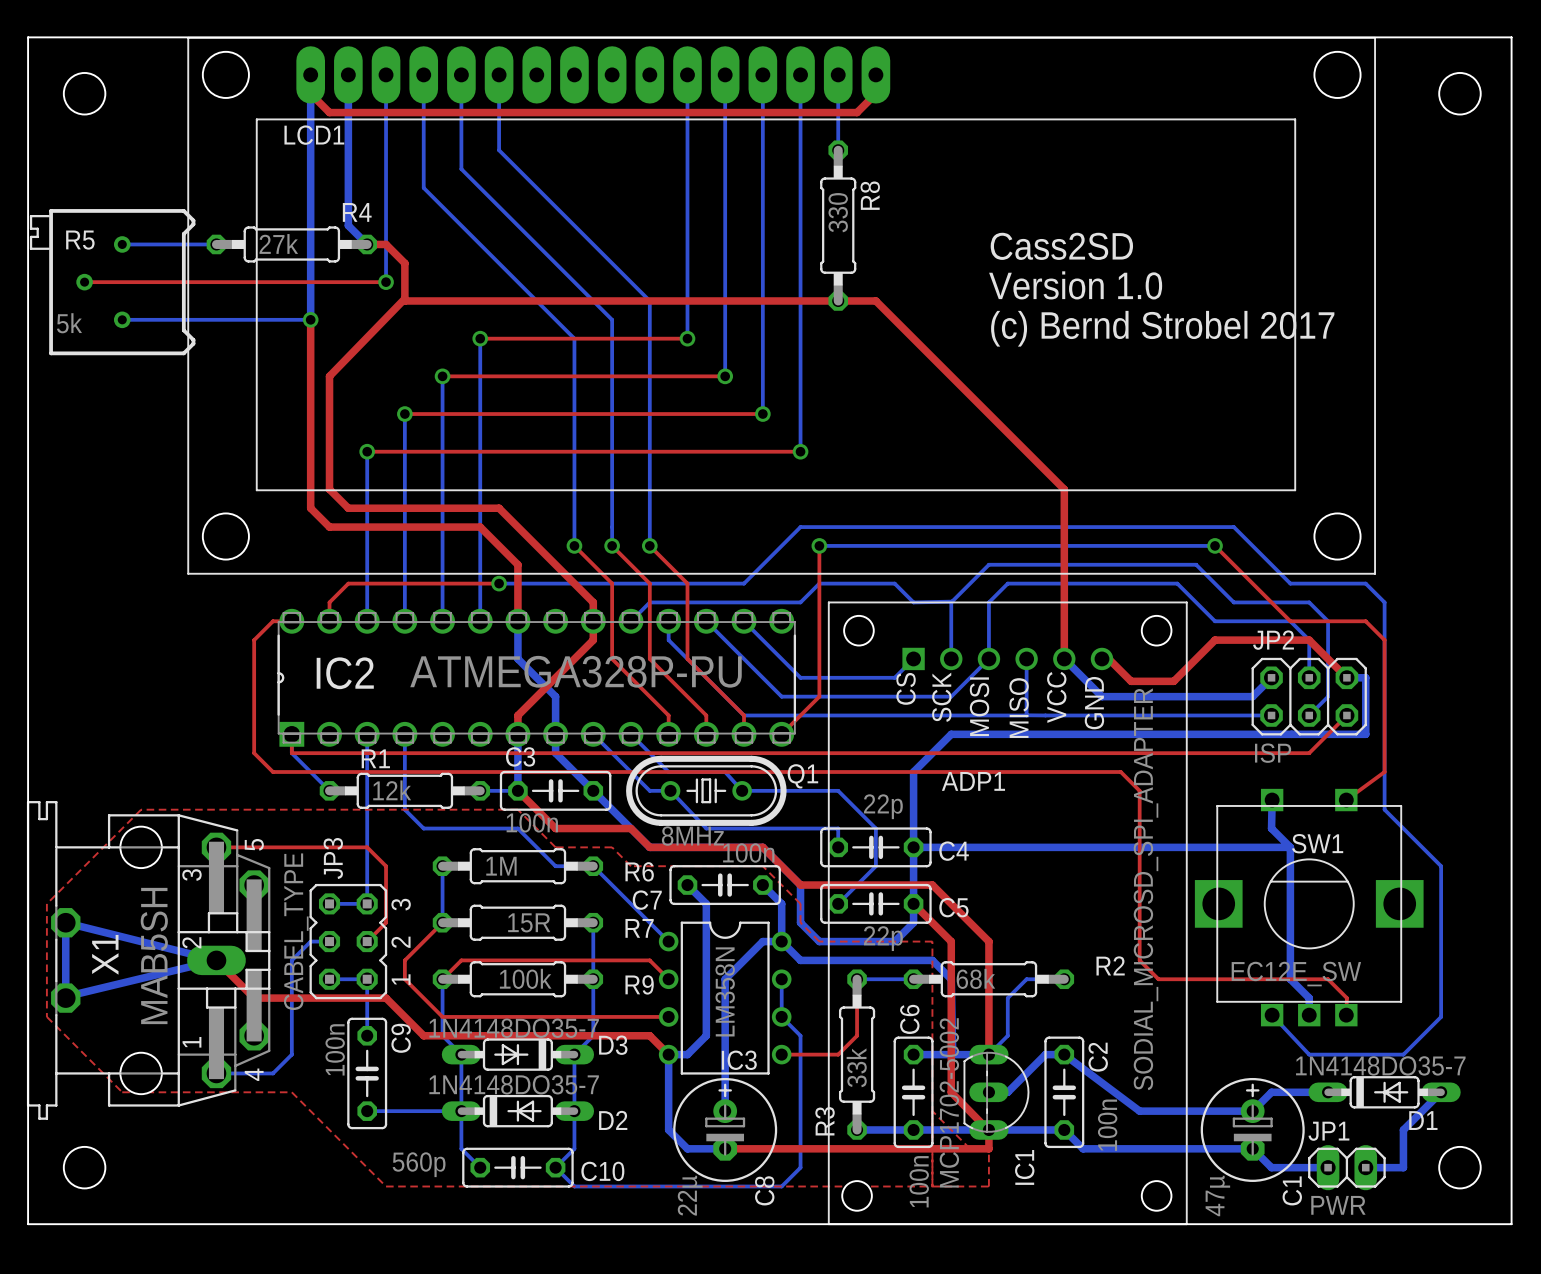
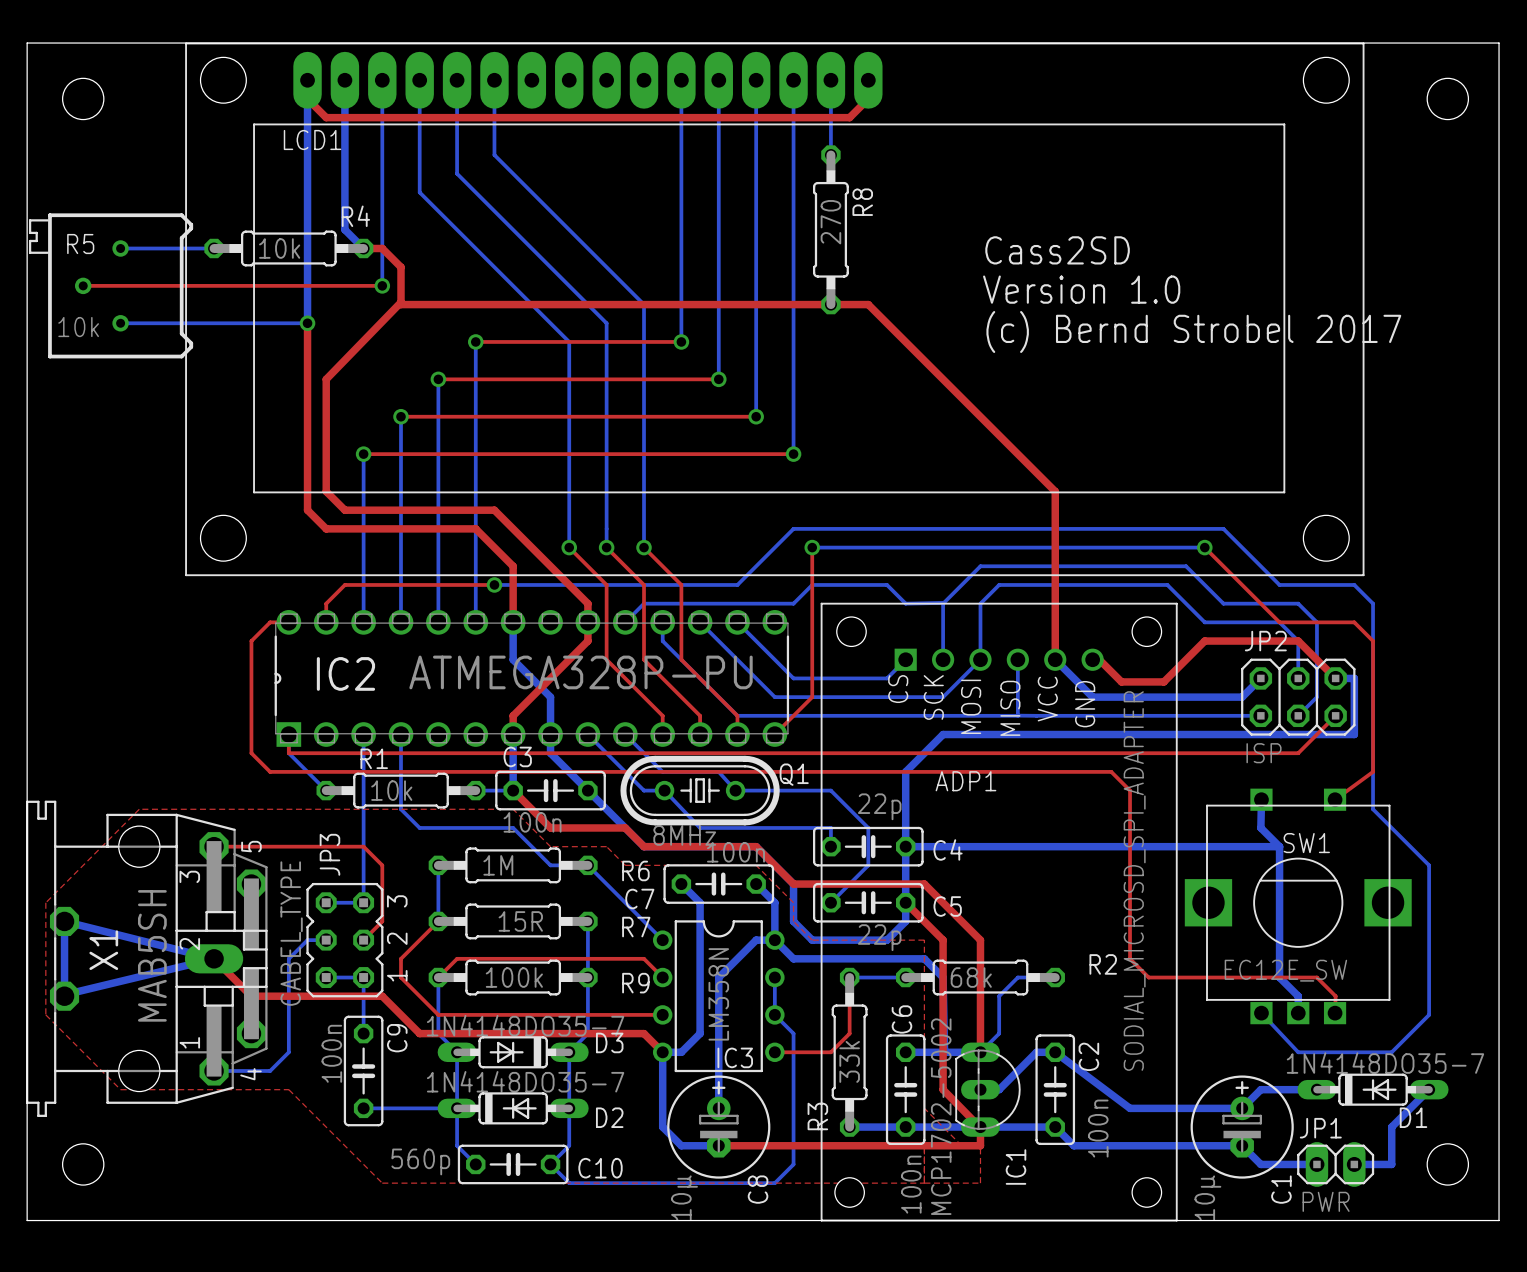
R8 value: 330 (838, 212) -> 270 (830, 222)
R4 value: 27k (278, 243) -> 10k (279, 248)
R5 value: 5k (69, 323) -> 10k (78, 327)
R1 value: 12k (392, 790) -> 10k (391, 790)
C8 value: 22µ (690, 1195) -> 10µ (684, 1197)
C1 value: 47µ (1217, 1196) -> 10µ (1207, 1197)

